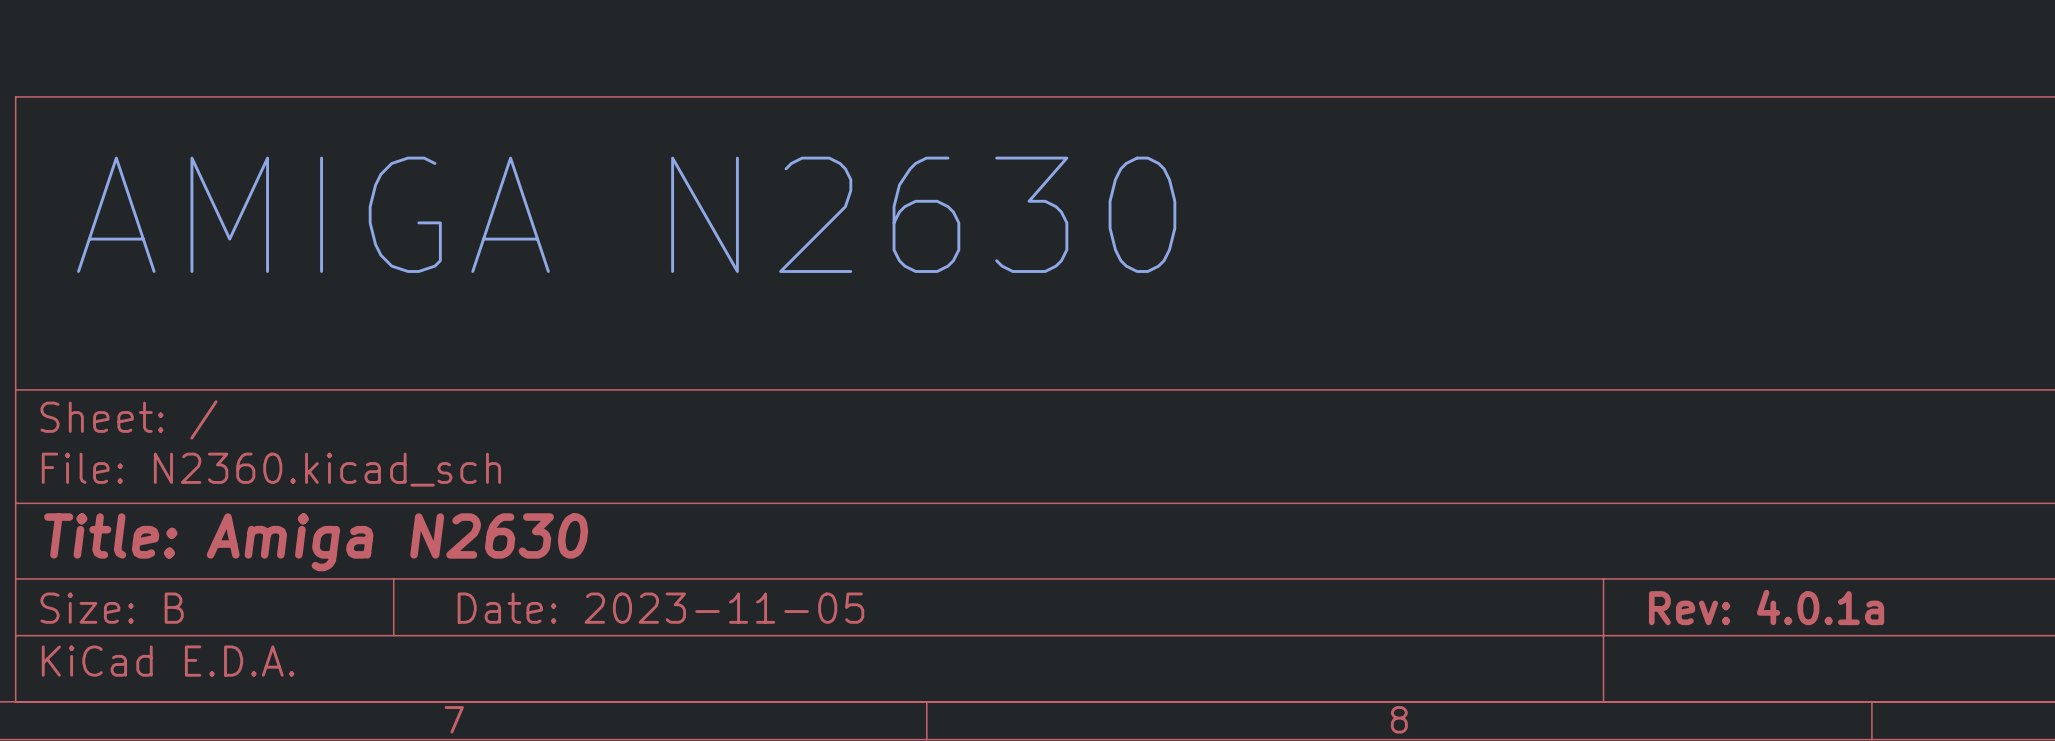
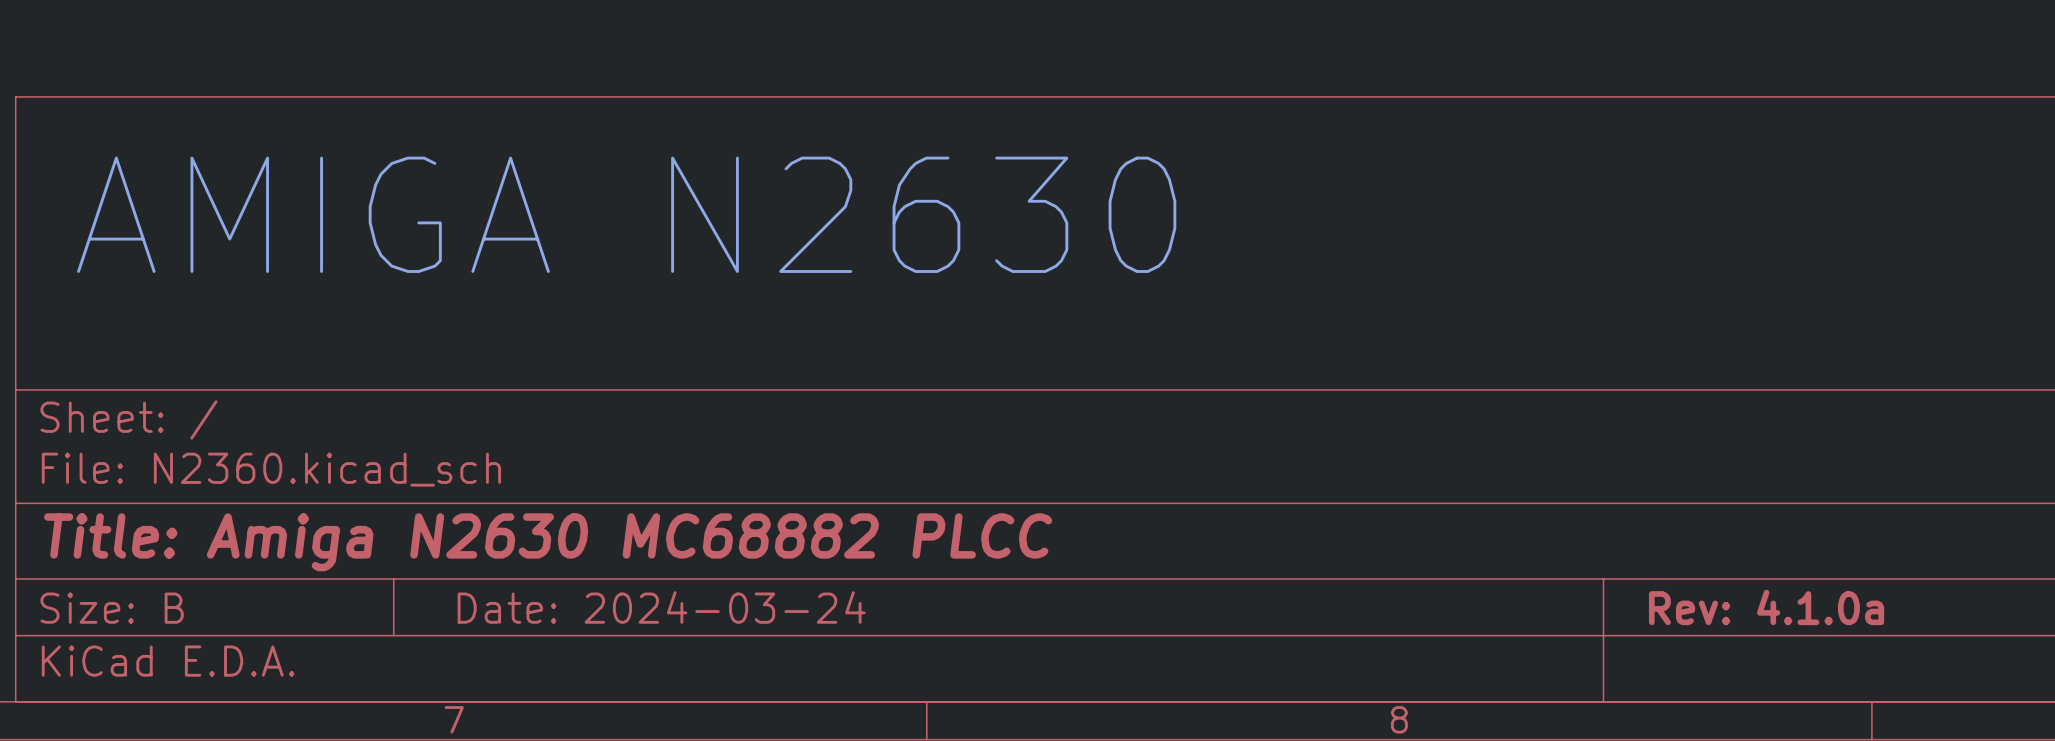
title block: Title: Amiga N2630 (316, 542) -> Title: Amiga N2630 MC68882 PLCC (548, 542)
title block: Rev: 4.0.1a (1766, 607) -> Rev: 4.1.0a (1766, 607)
title block: Date: 2023-11-05 (660, 608) -> Date: 2024-03-24 (661, 607)

